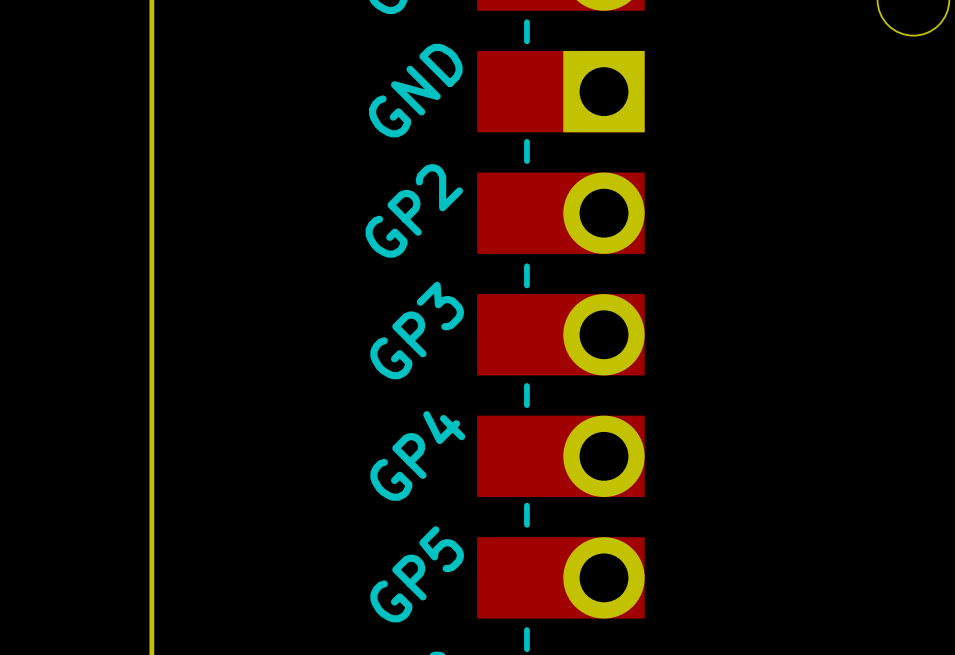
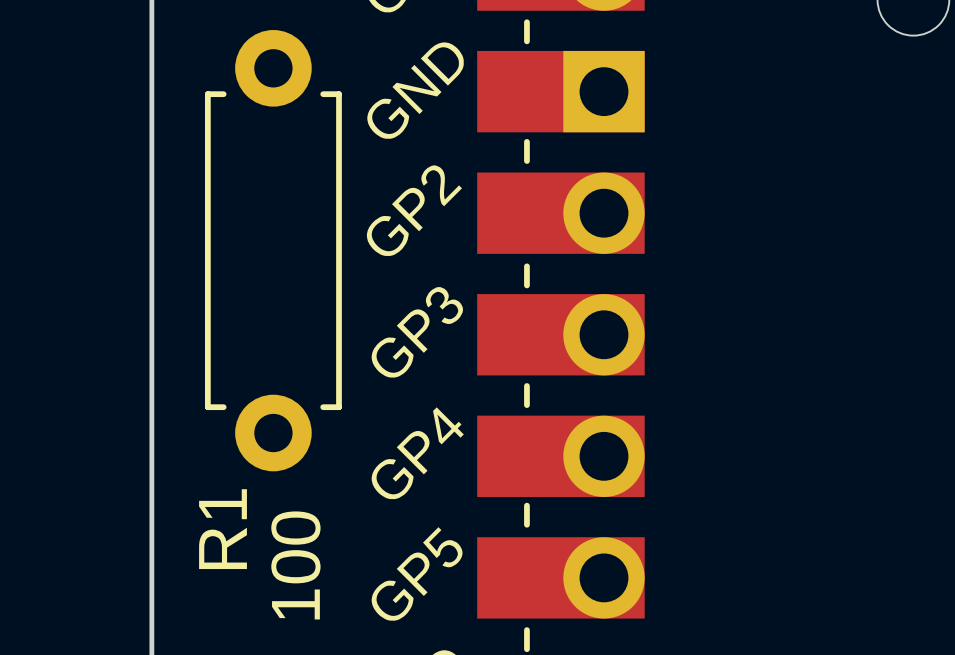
R1: none -> 100 (273, 250)

